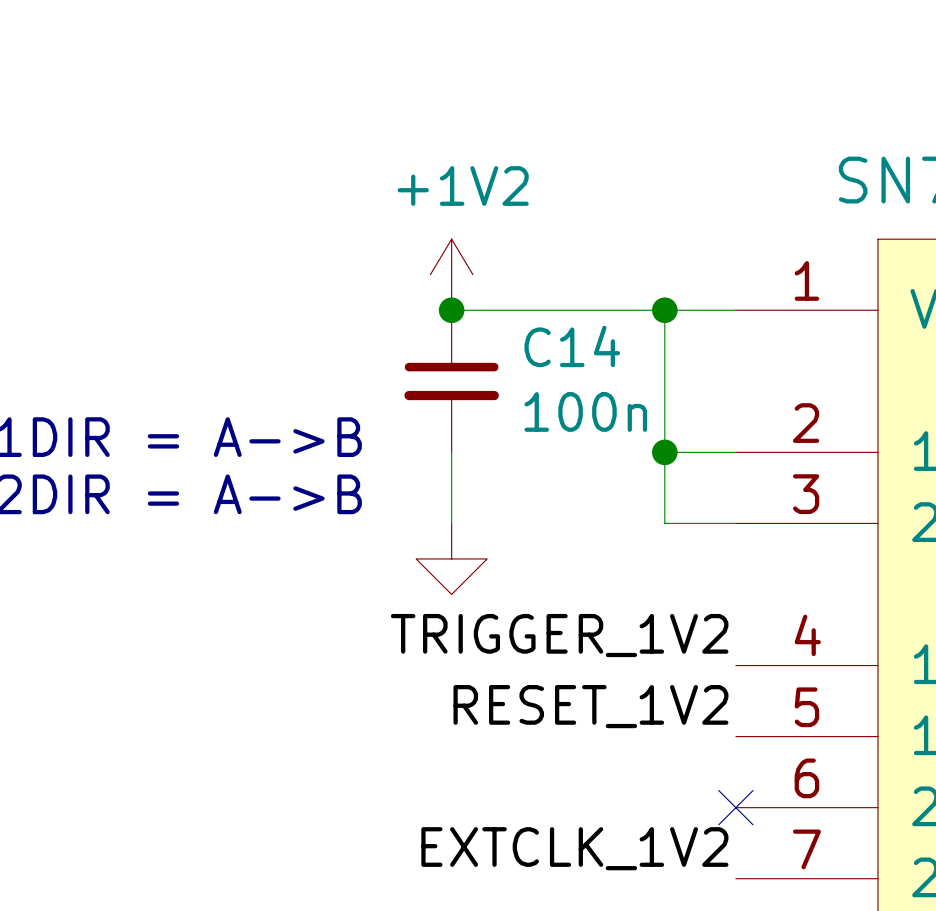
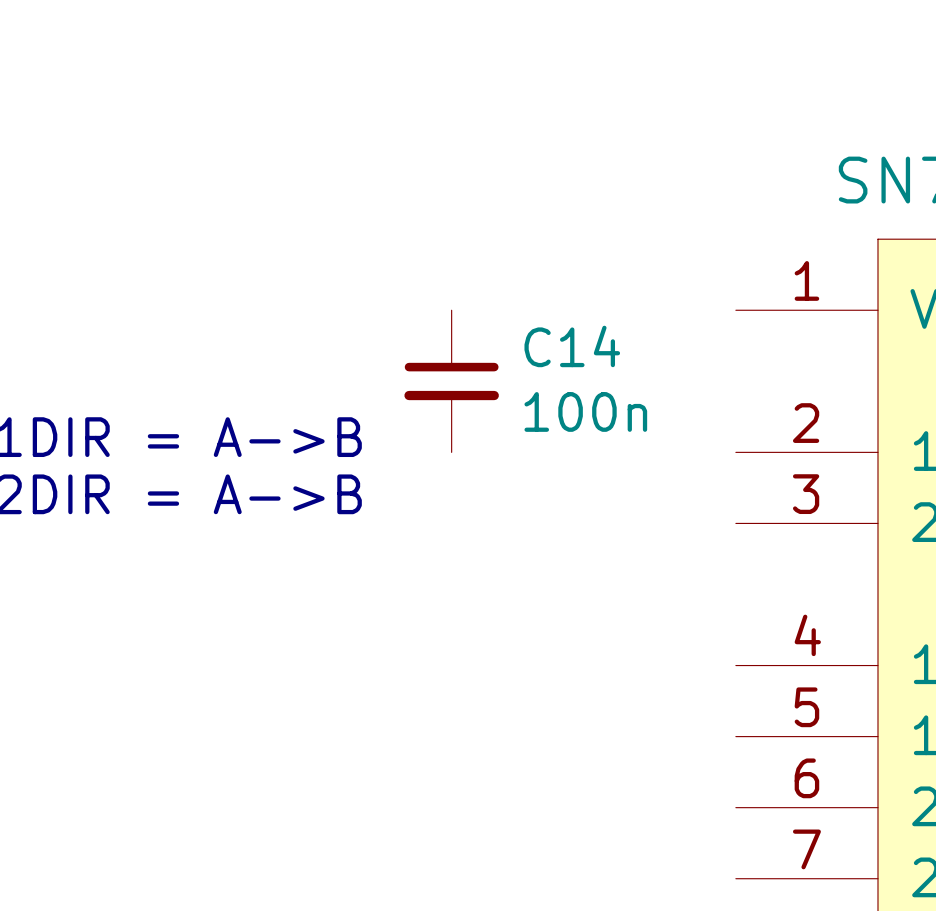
power symbol: +1V2 (451, 274) -> none
wire: (451, 310) (735, 310) -> none
junction: (451, 310) -> none
wire: (664, 310) (664, 523) (735, 523) -> none
junction: (664, 310) -> none
wire: (451, 452) (451, 523) -> none
wire: (664, 452) (735, 452) -> none
junction: (664, 452) -> none
power symbol: (451, 558) -> none
label: TRIGGER_1V2 (559, 635) -> none
label: RESET_1V2 (590, 706) -> none
no-connect mark: (735, 807) -> none
label: EXTCLK_1V2 (574, 848) -> none

